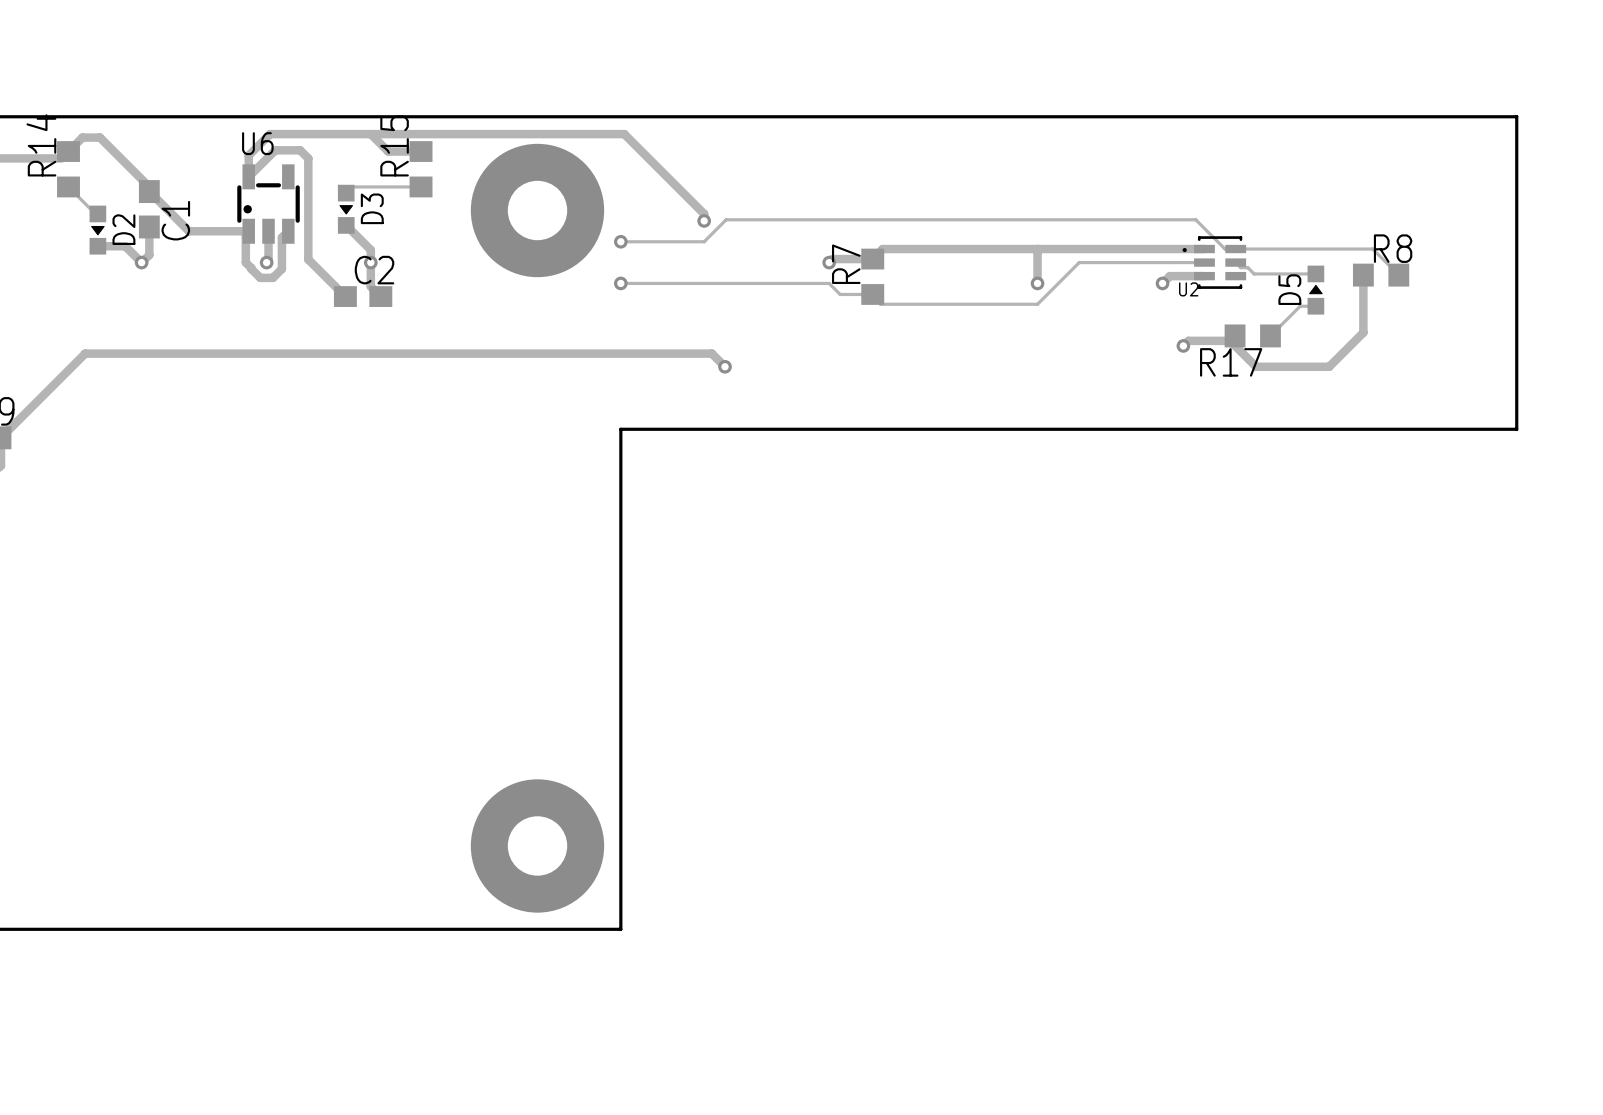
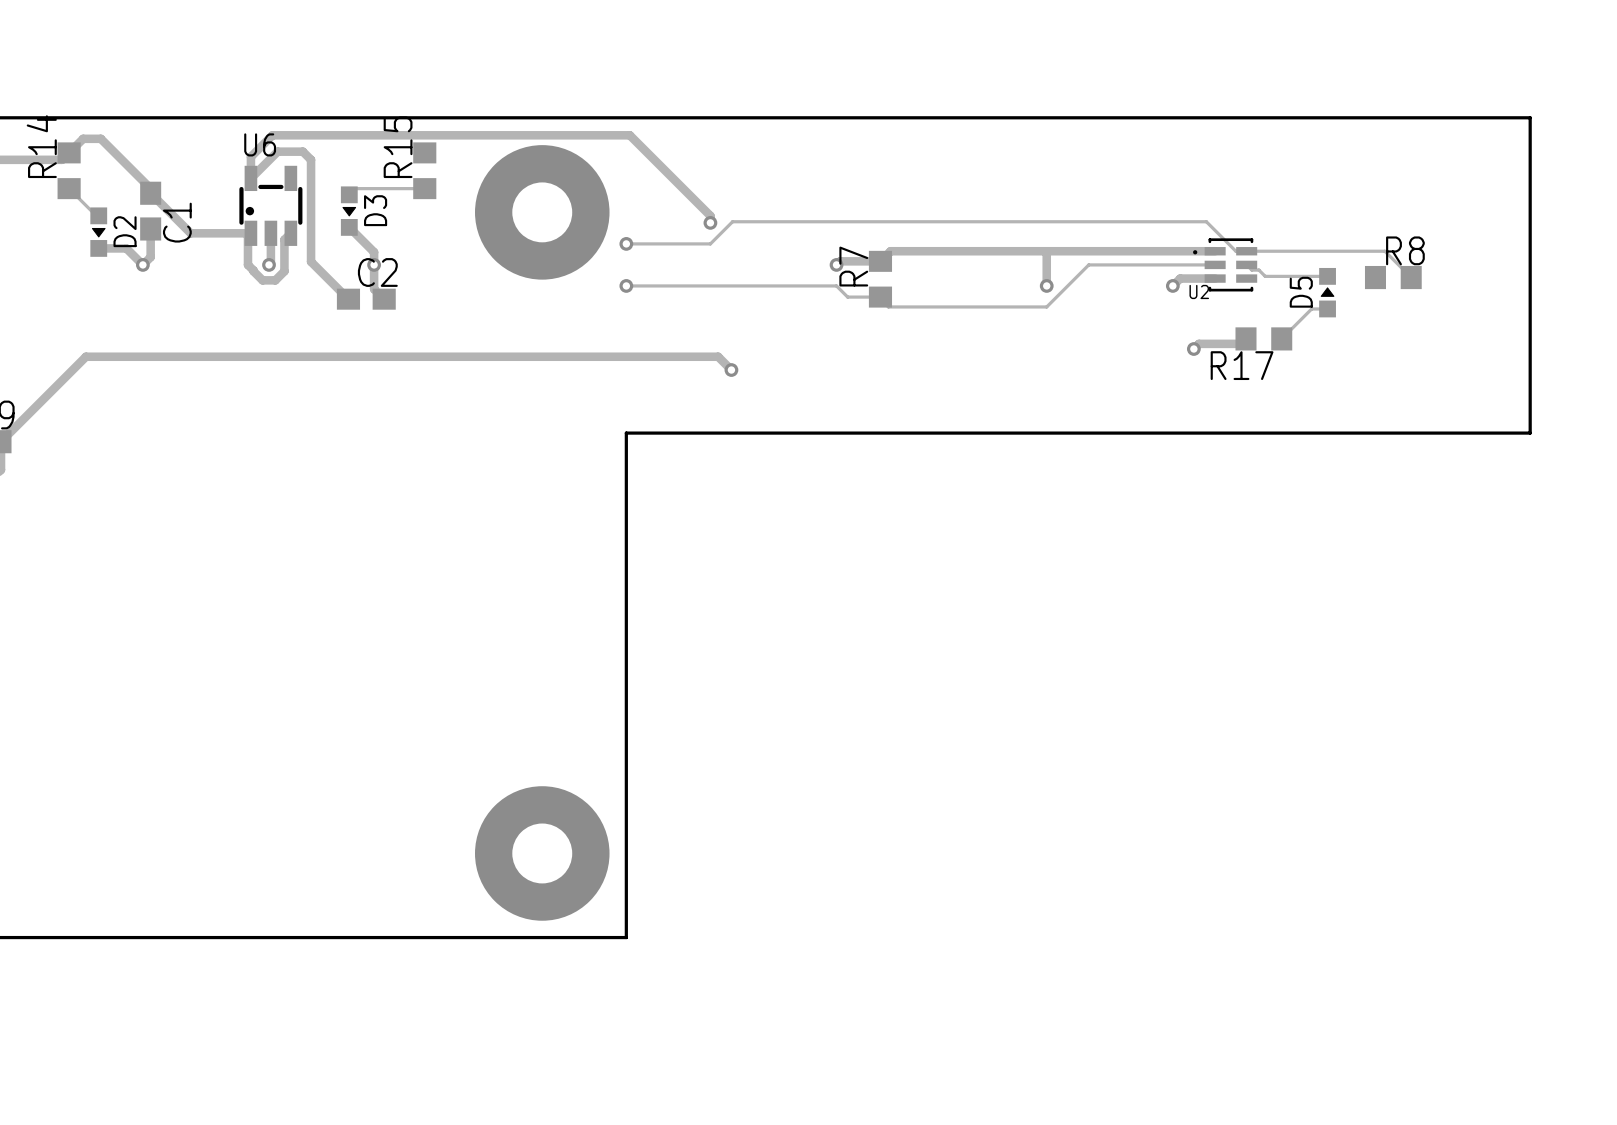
track: (370, 134) (388, 151) (421, 151) -> none
track: (1363, 275) (1363, 332) (1329, 366) (1256, 366) (1230, 340) -> none

